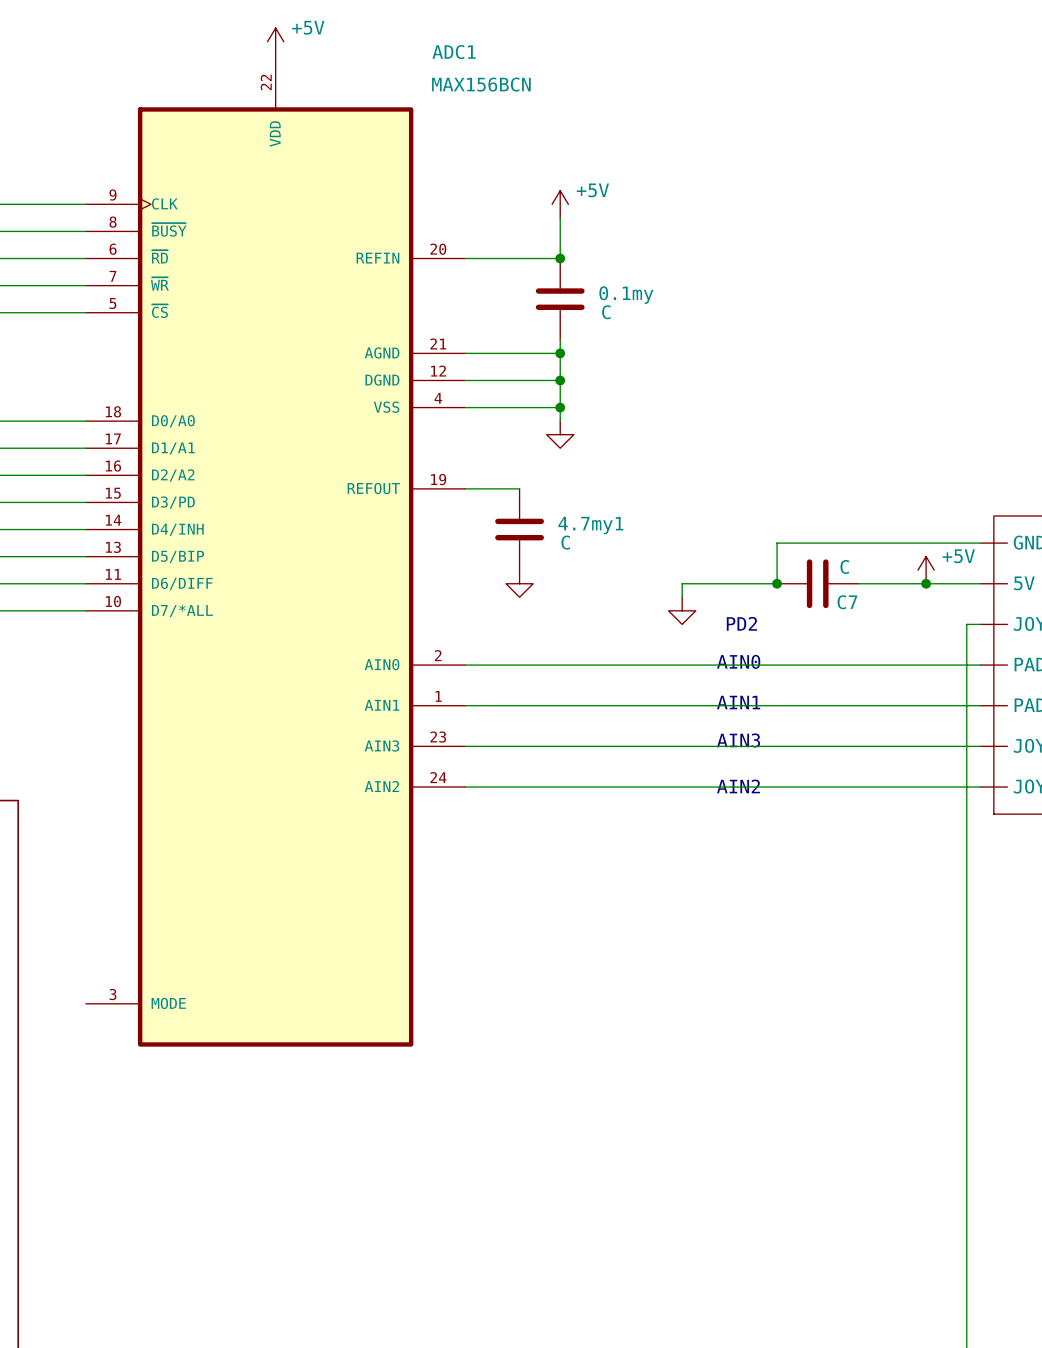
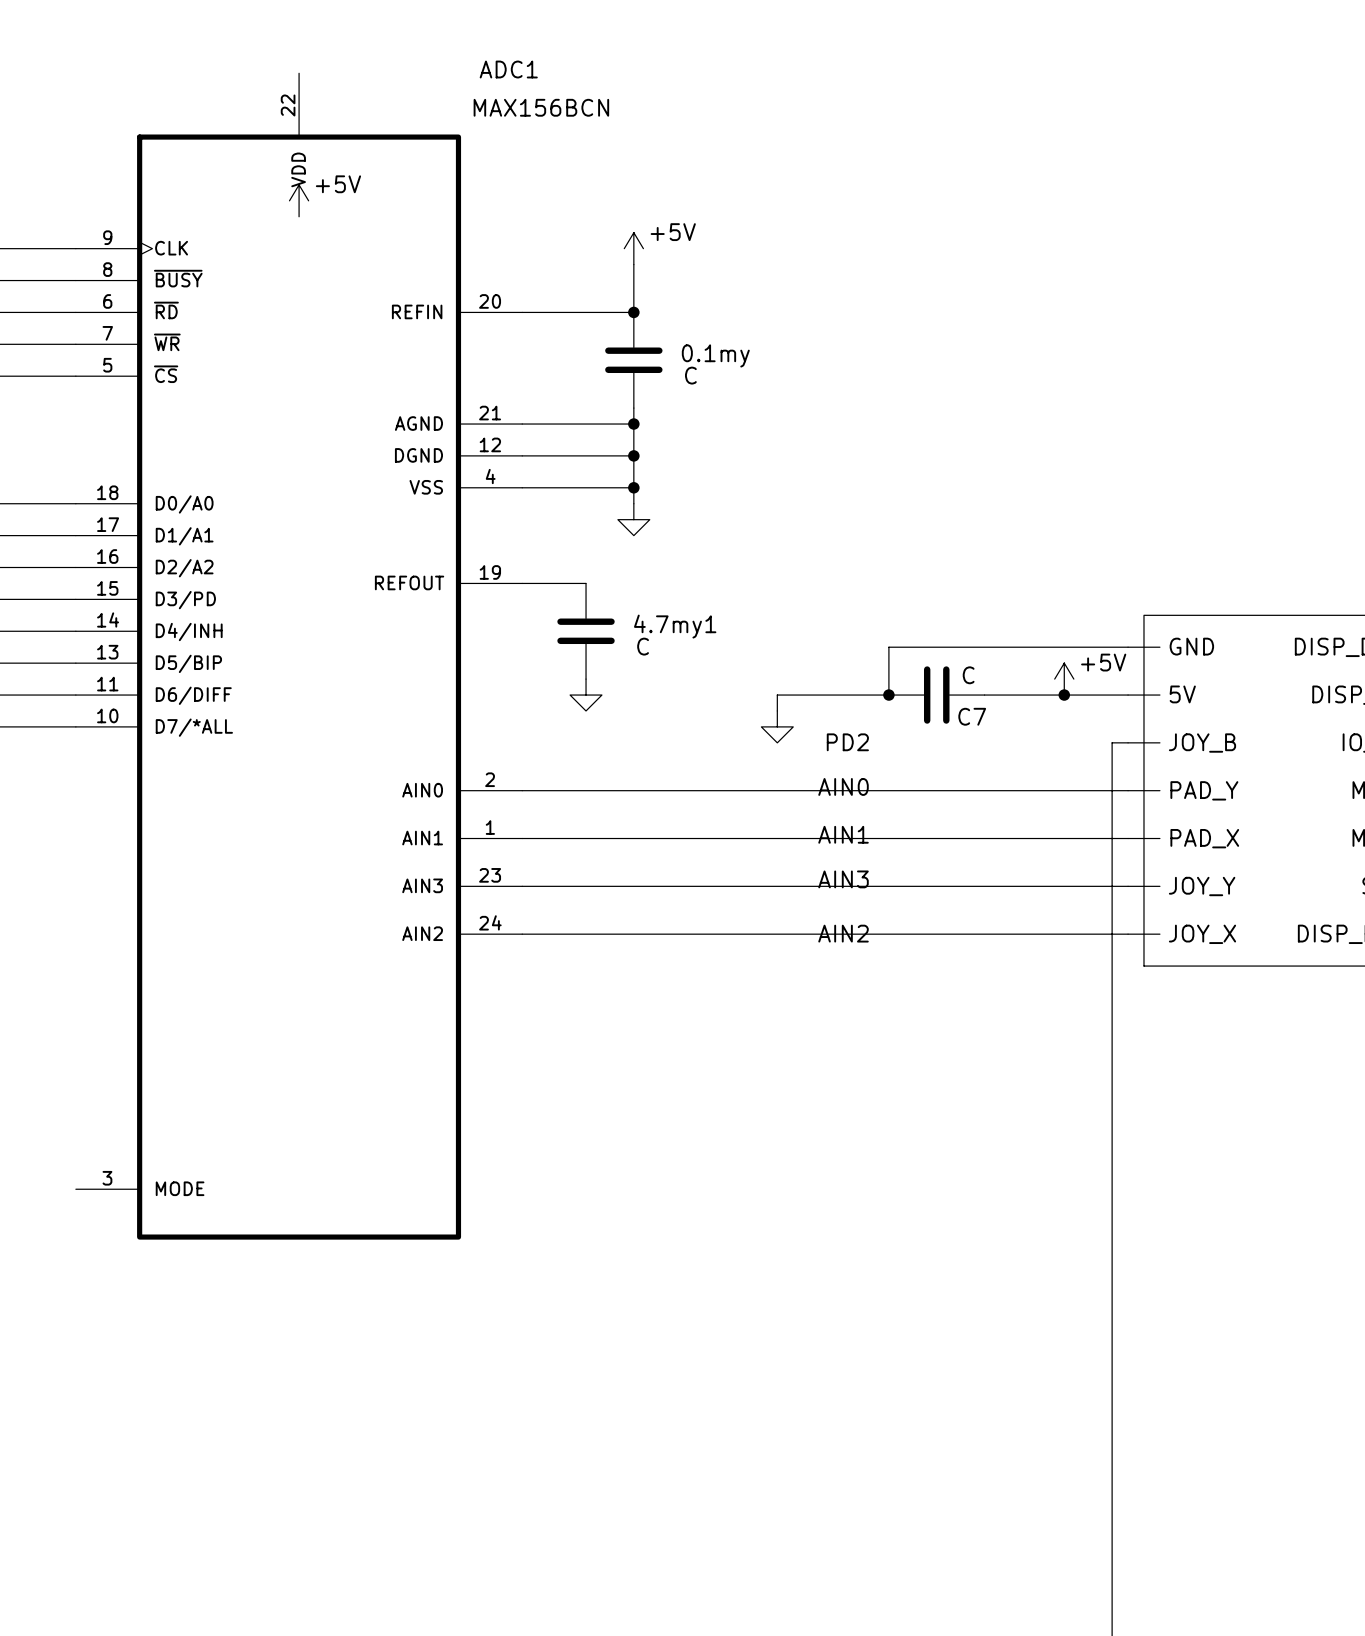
power symbol position: +5V (275, 41) -> +5V (299, 200)

